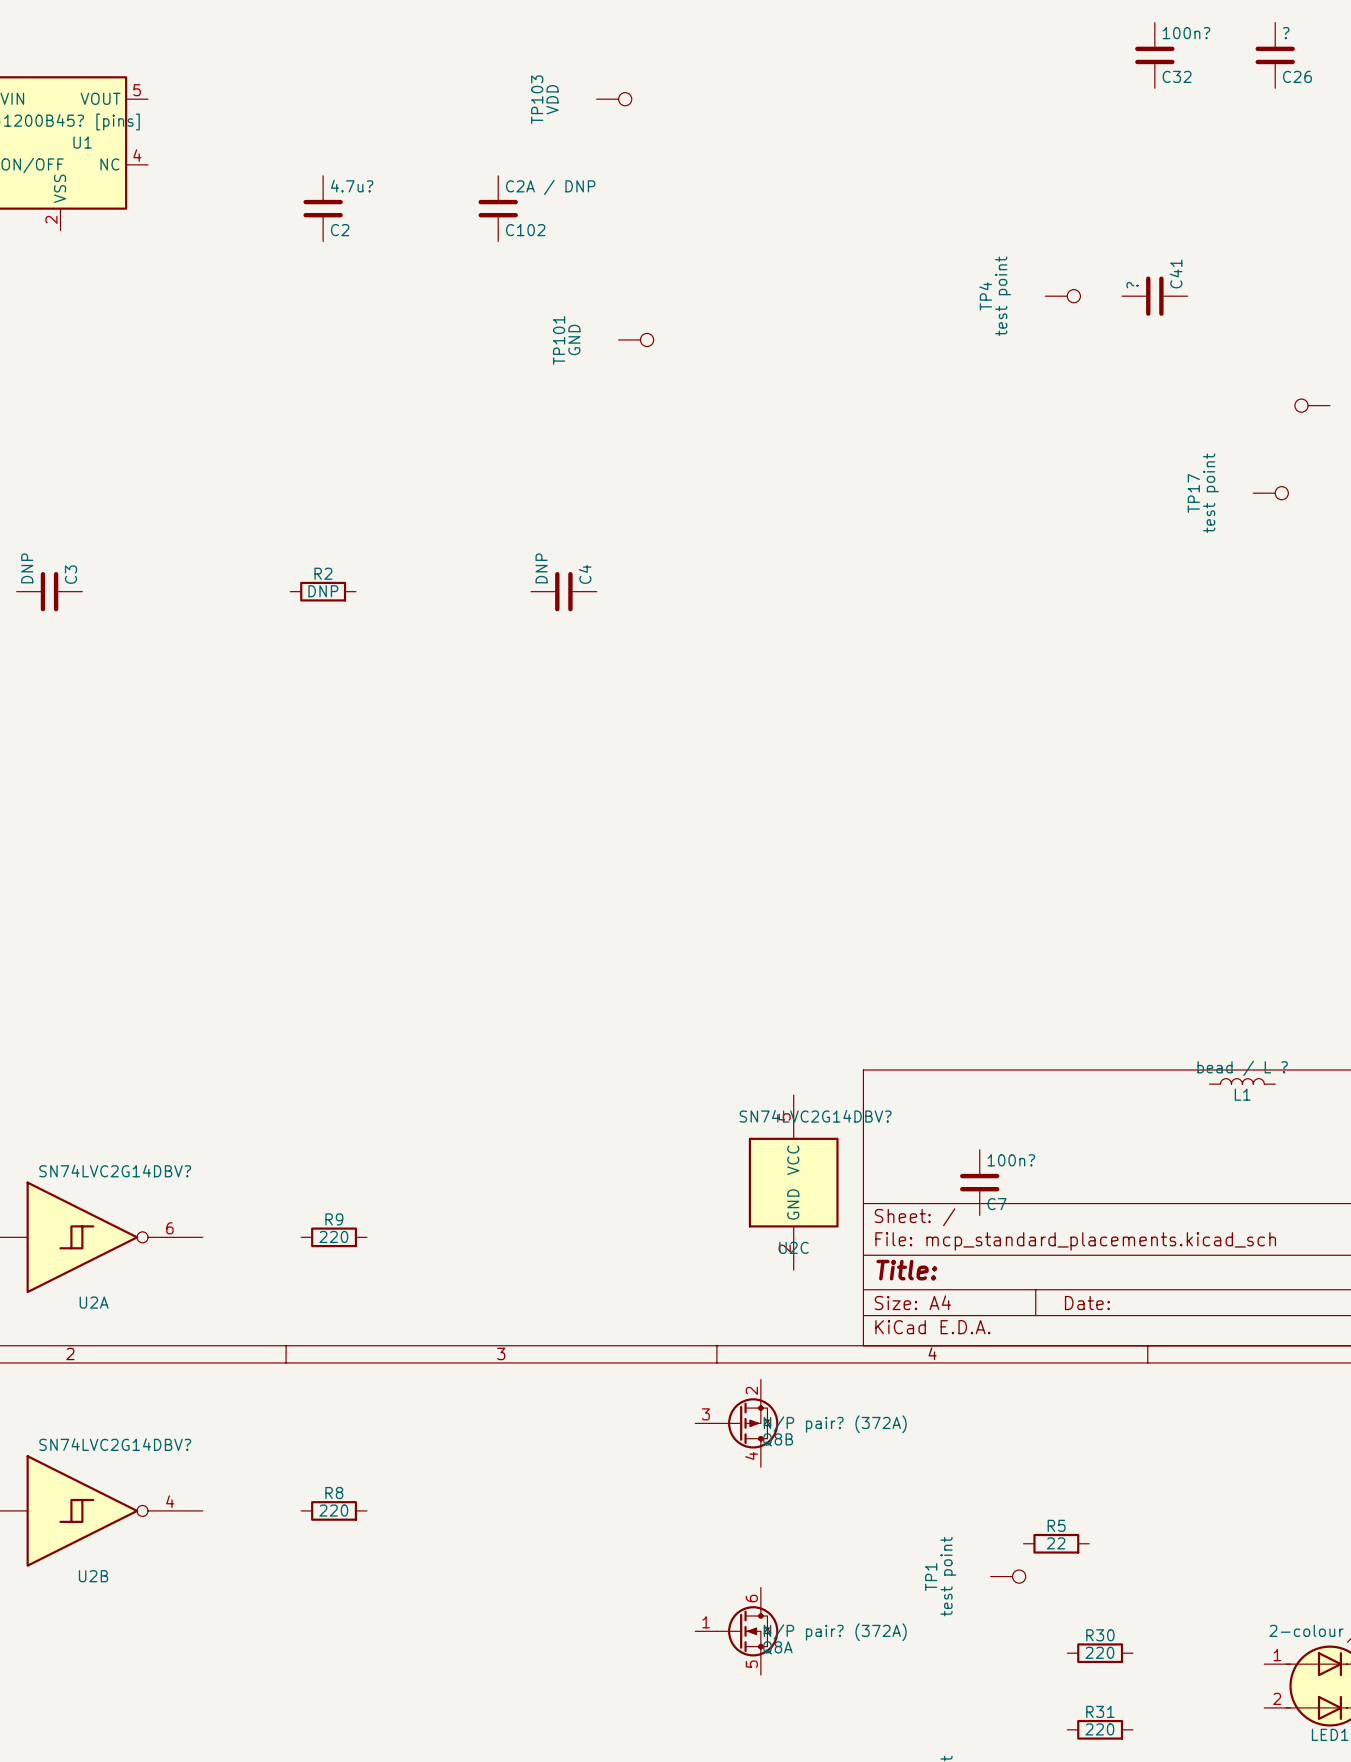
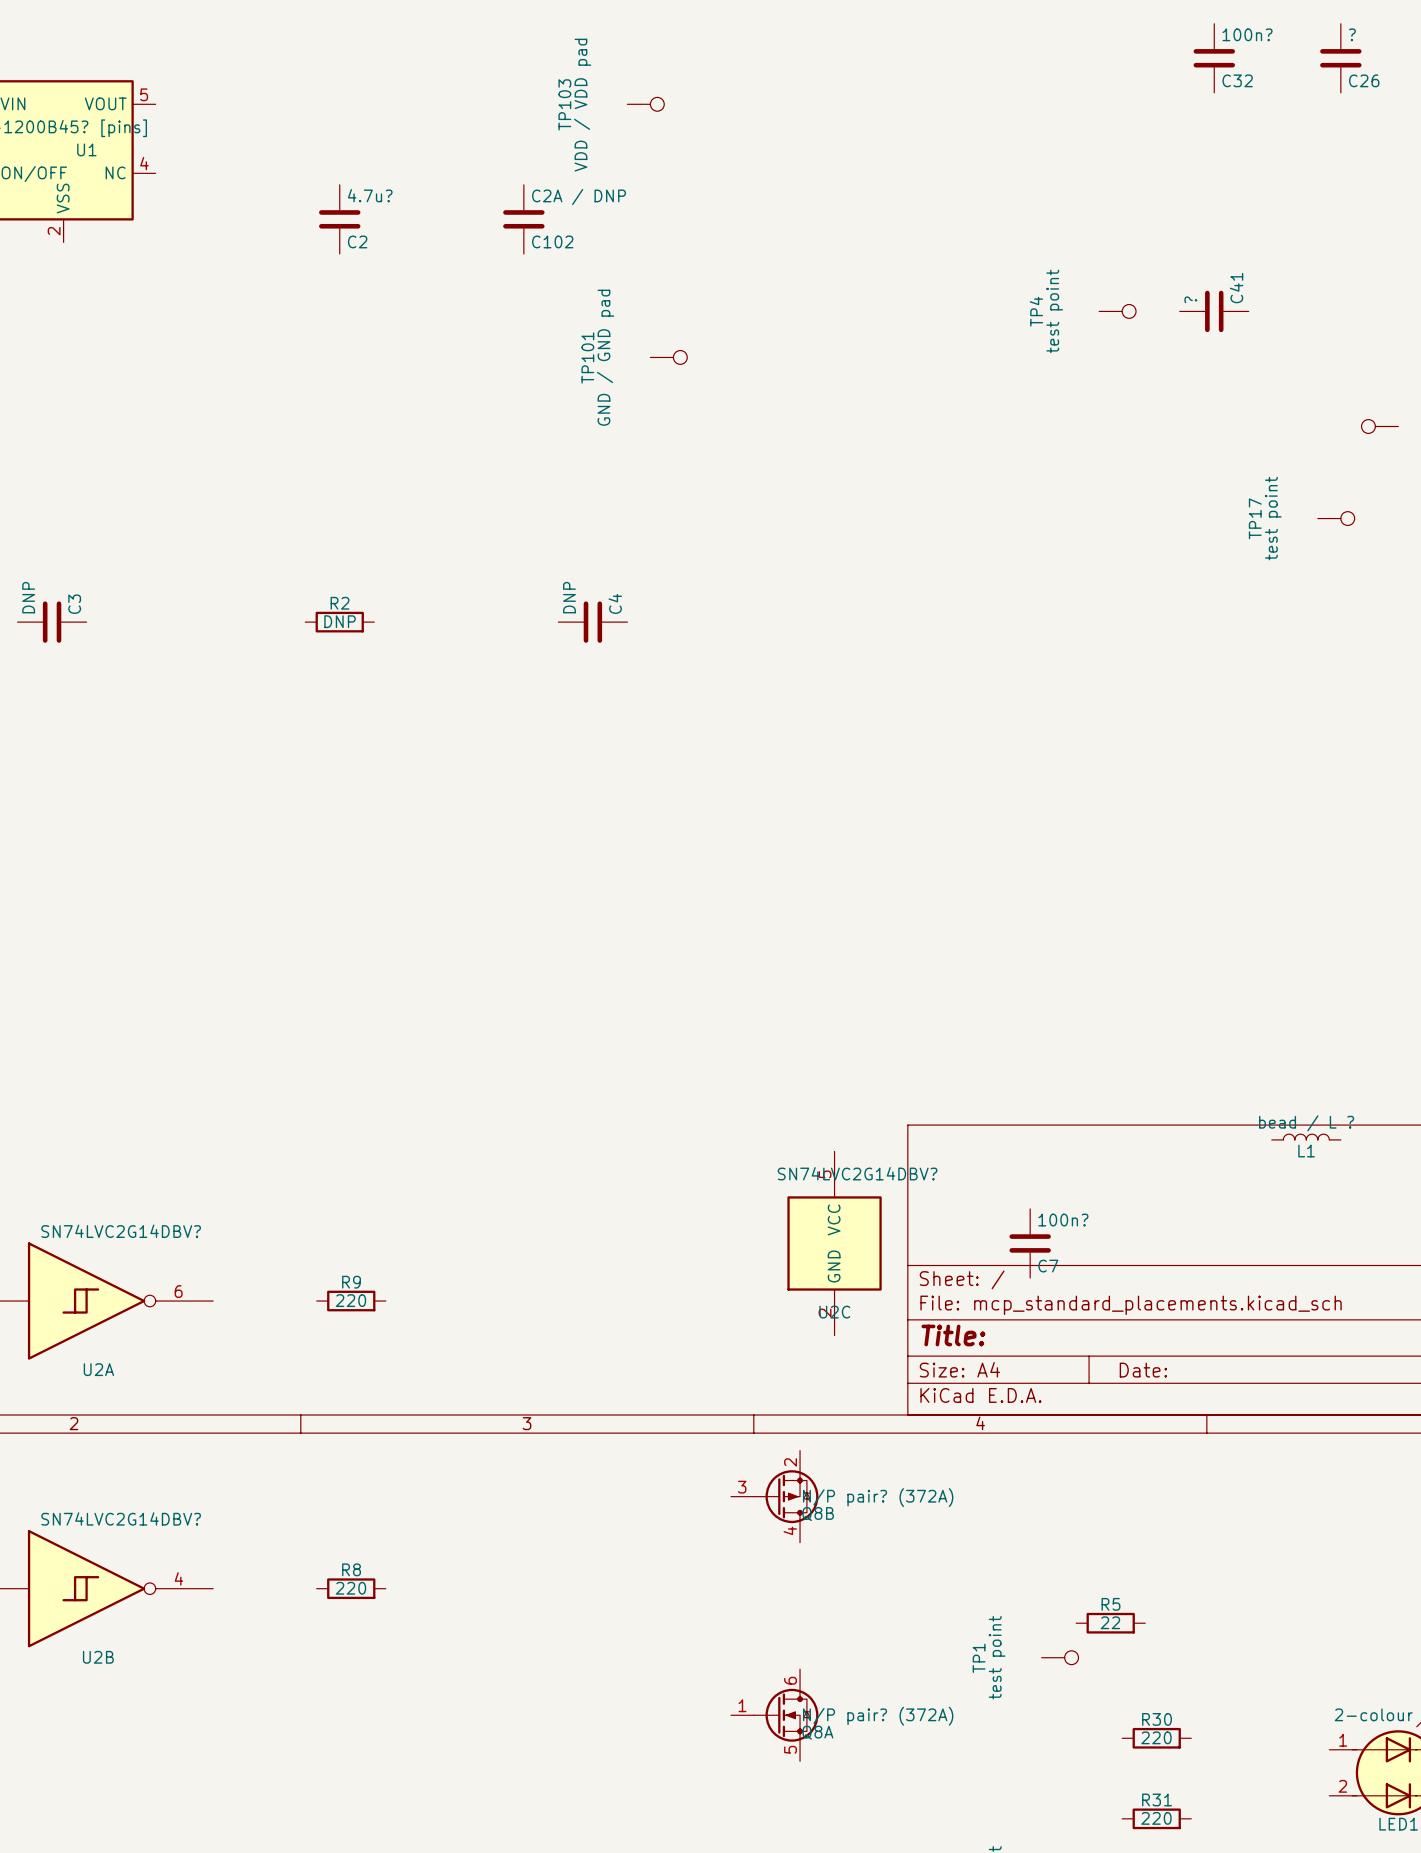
TP103 value: VDD (552, 99) -> VDD / VDD pad (582, 105)
TP101 value: GND (574, 339) -> GND / GND pad (605, 357)

